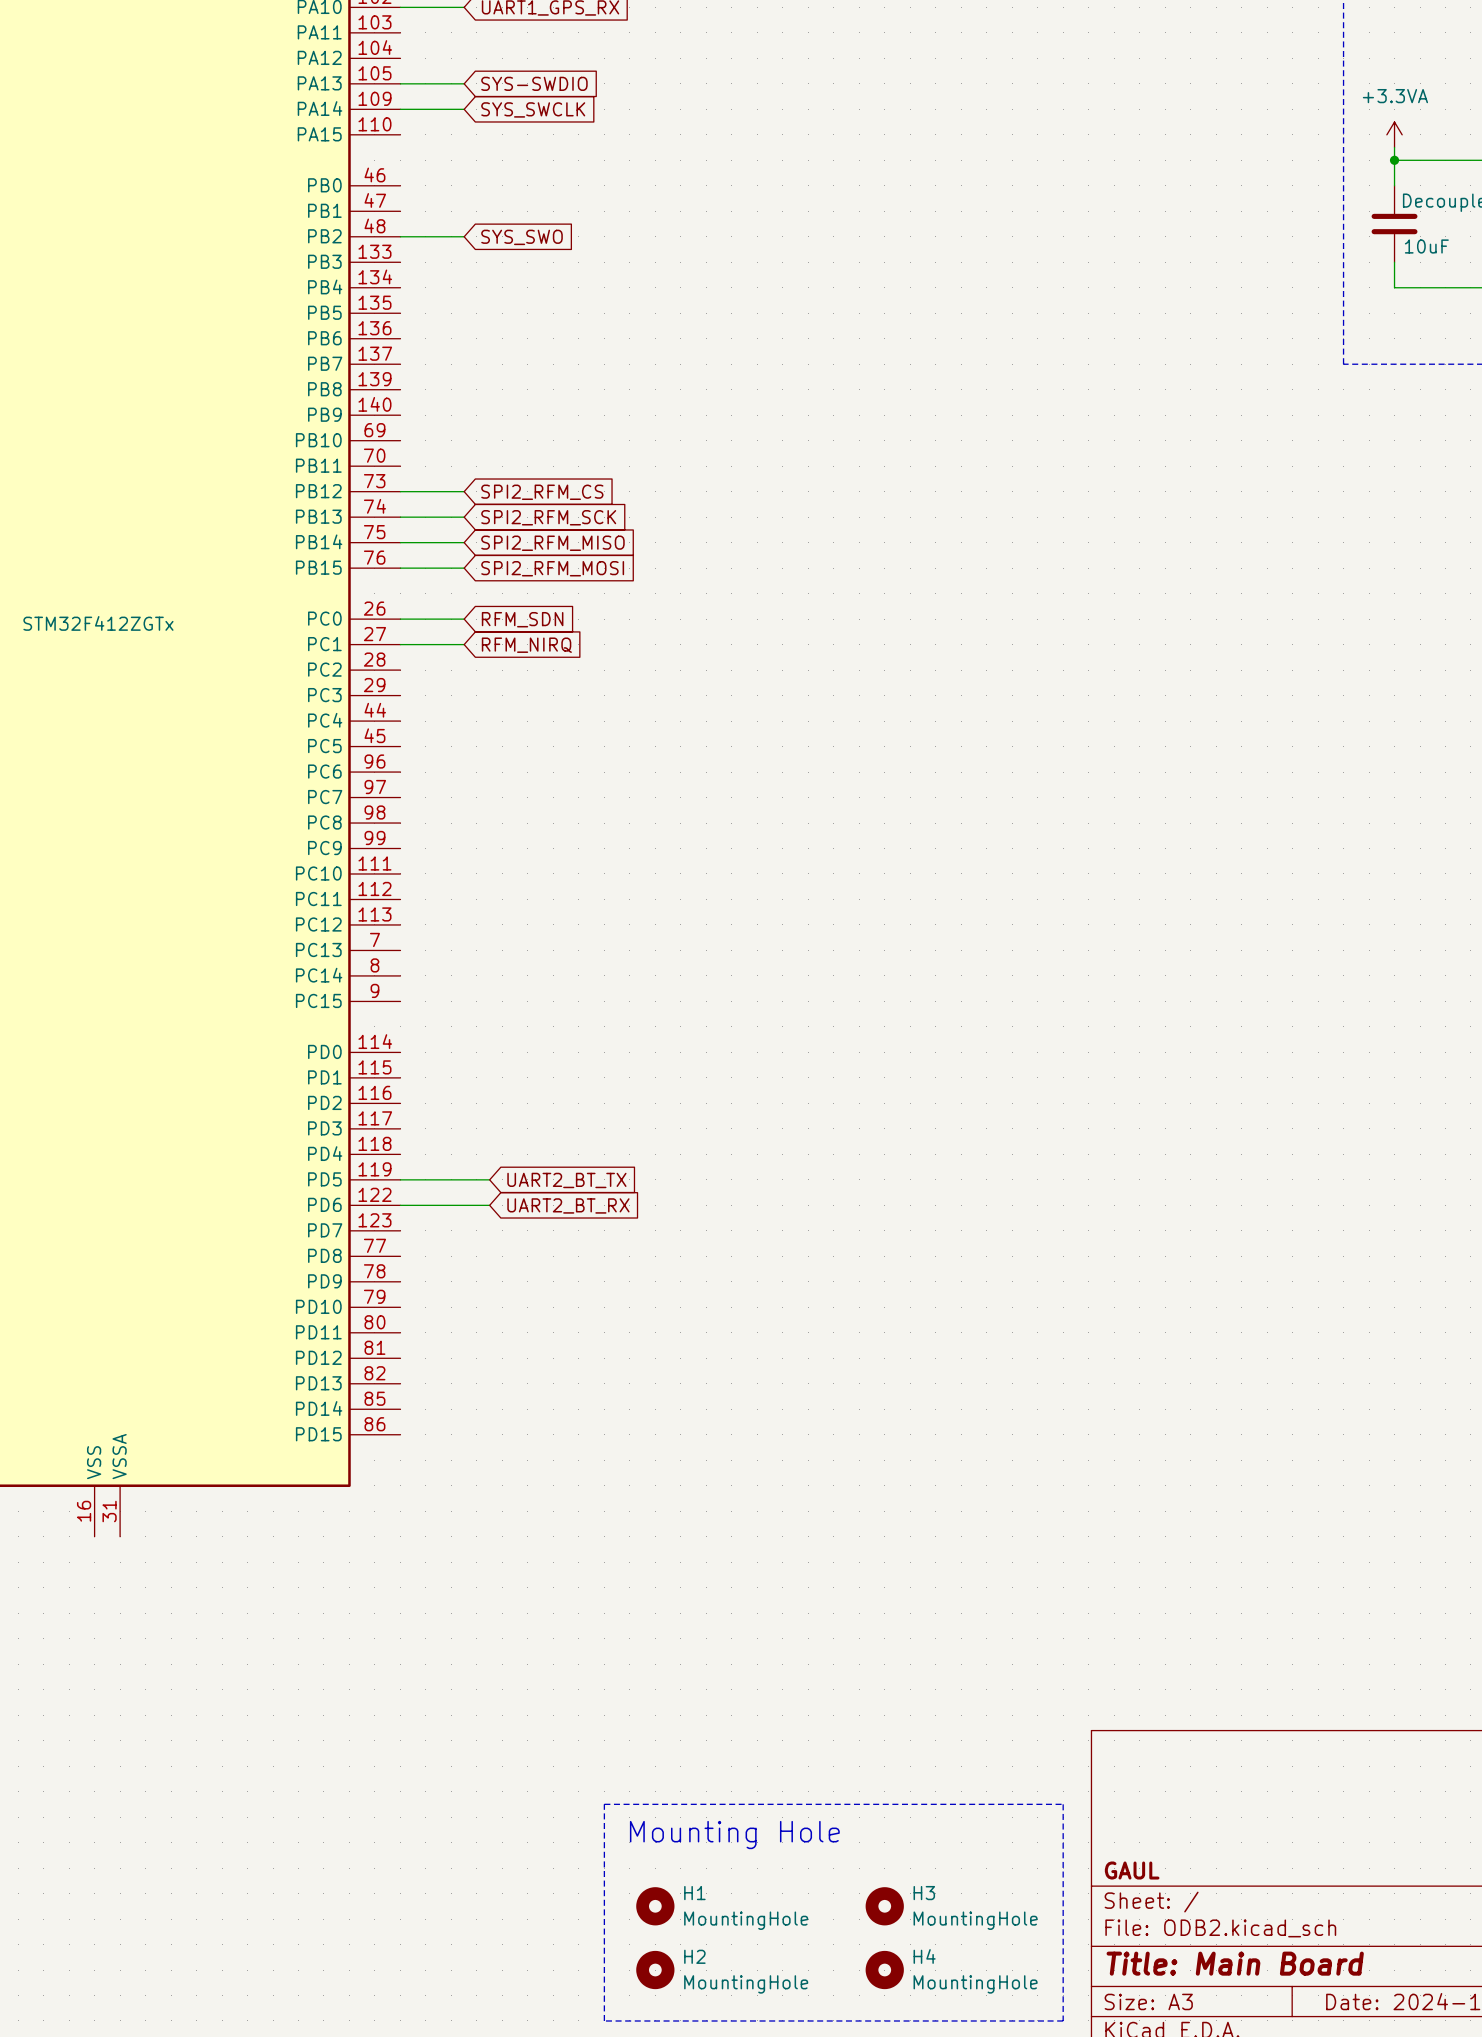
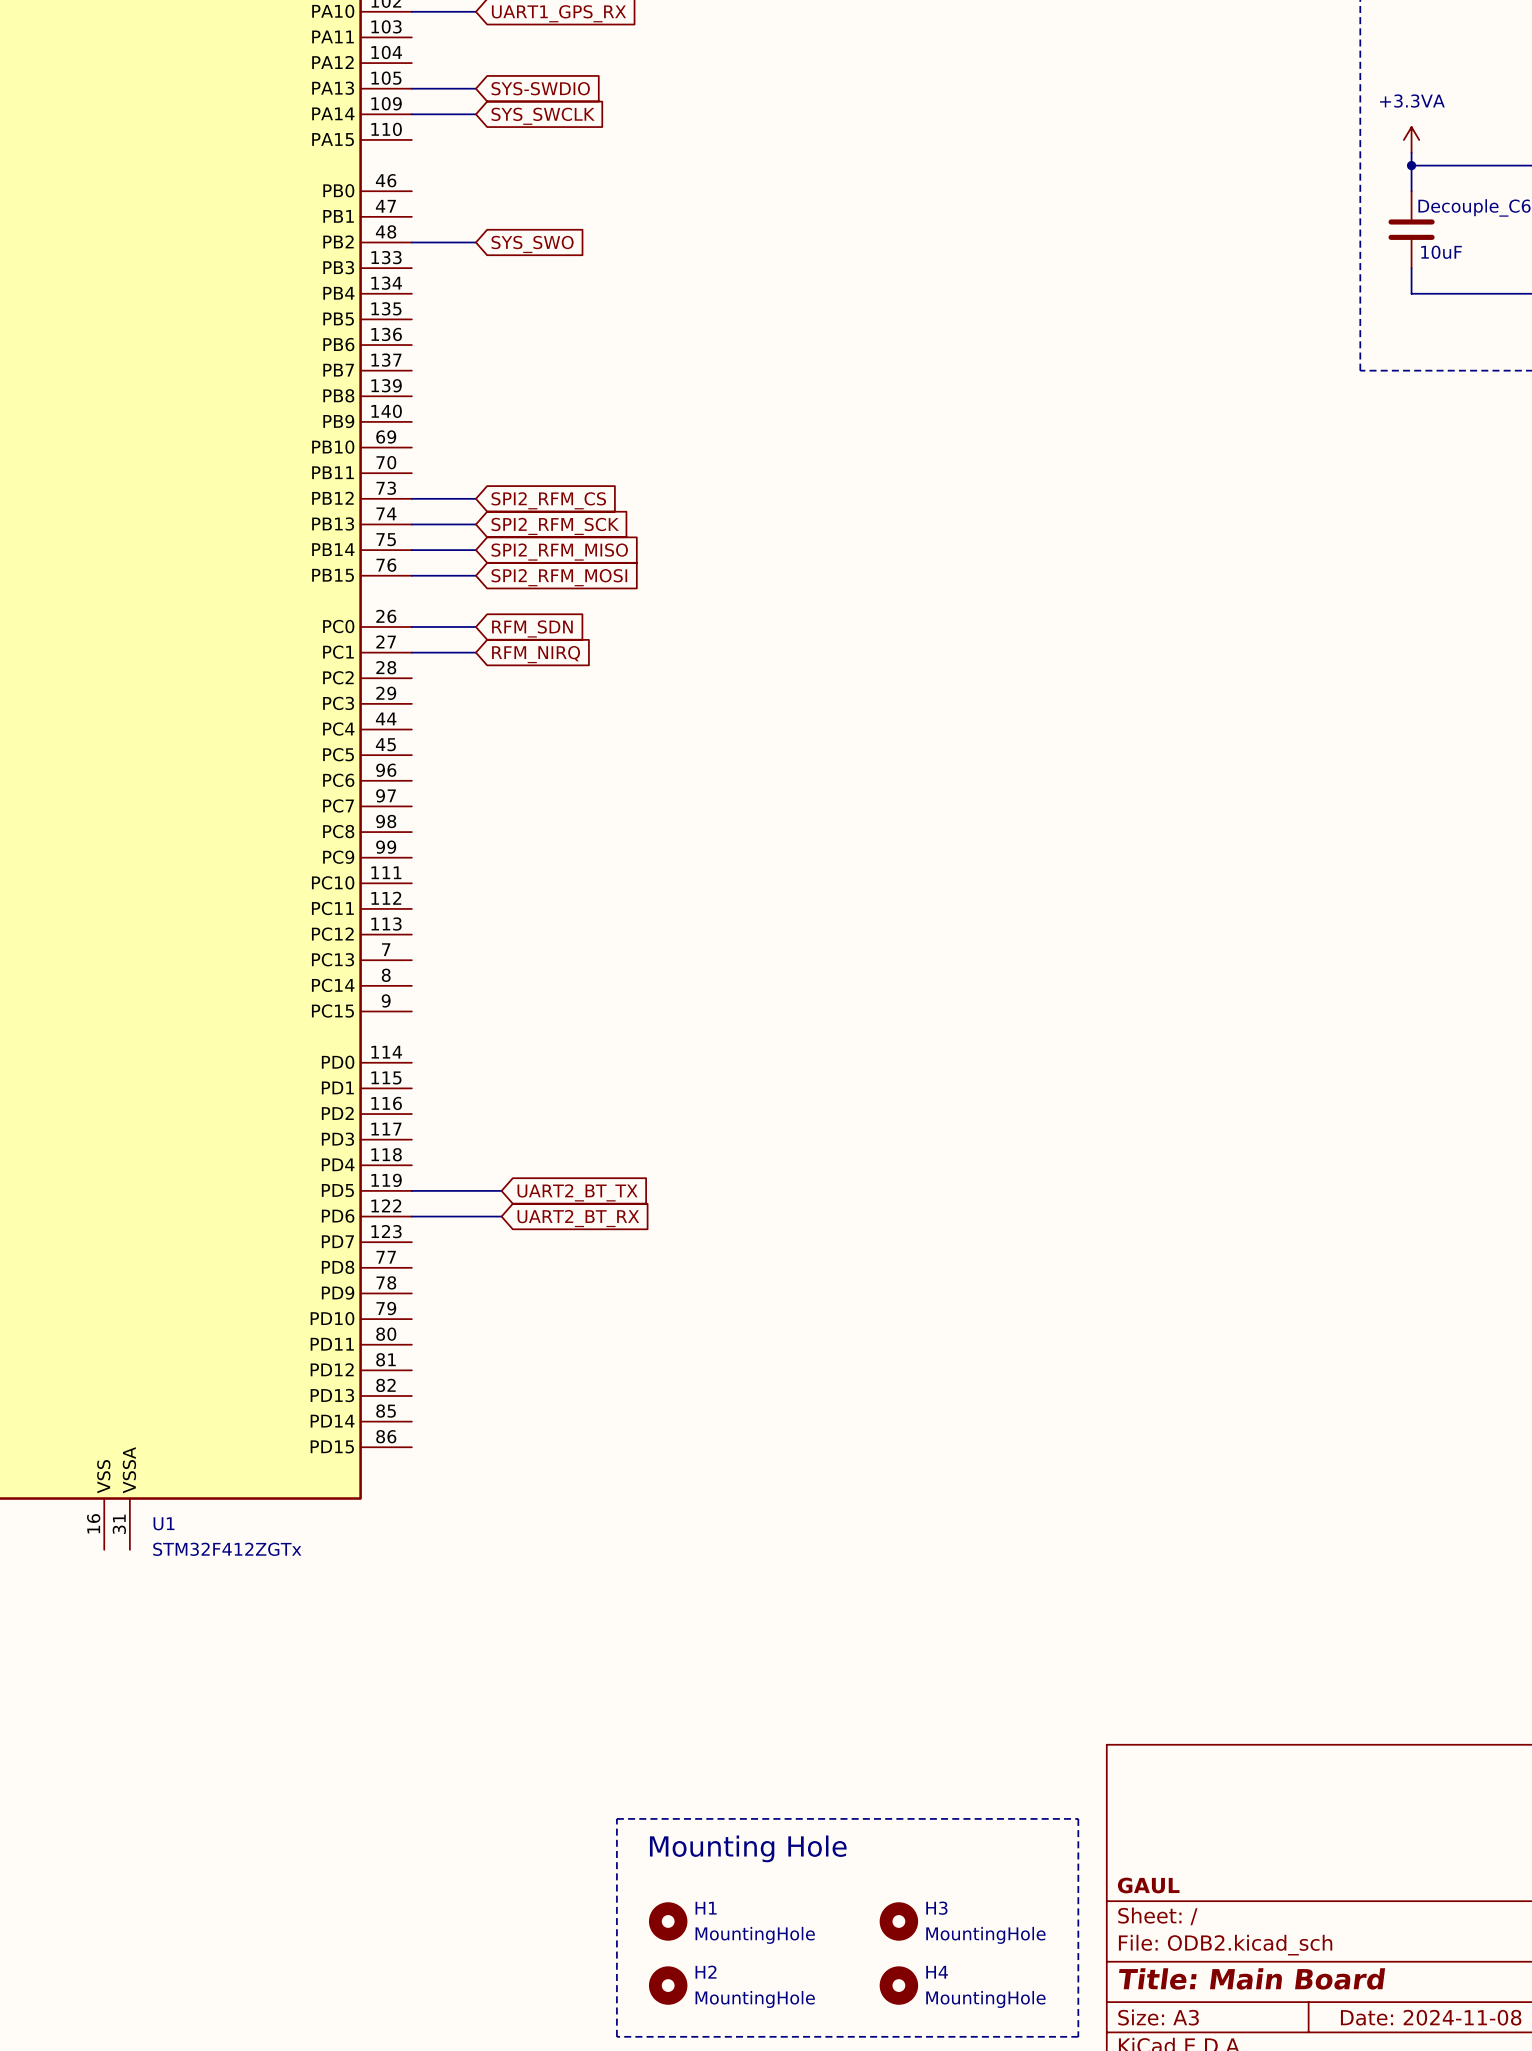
U1 value position: STM32F412ZGTx (98, 623) -> STM32F412ZGTx (227, 1549)
U1 name: none -> U1 (164, 1523)

